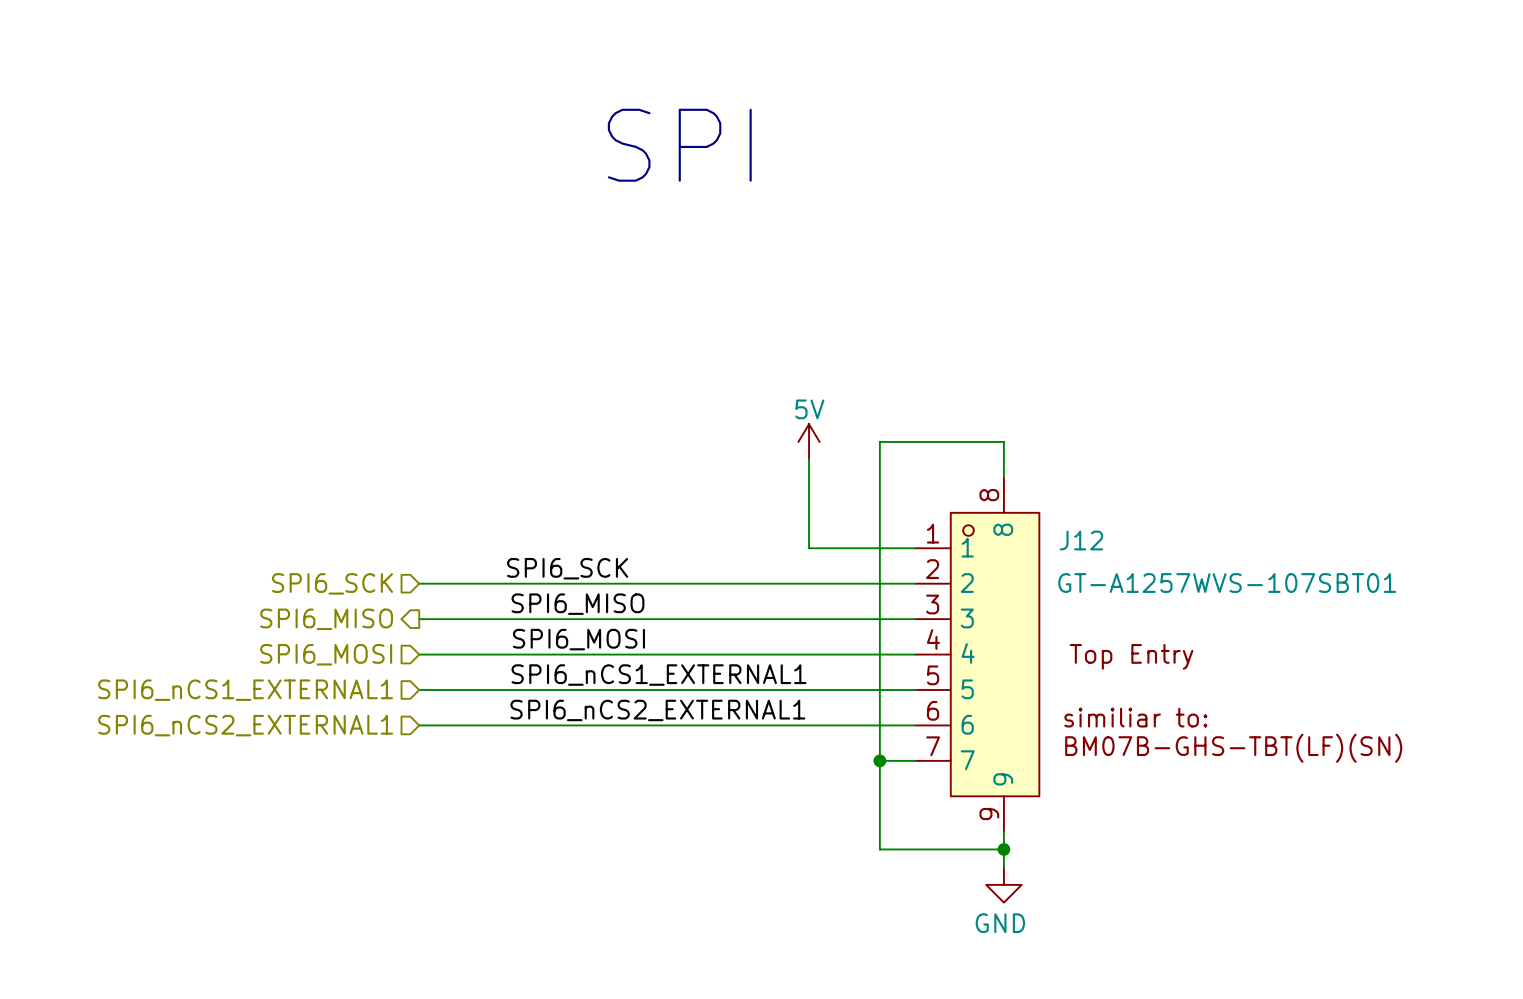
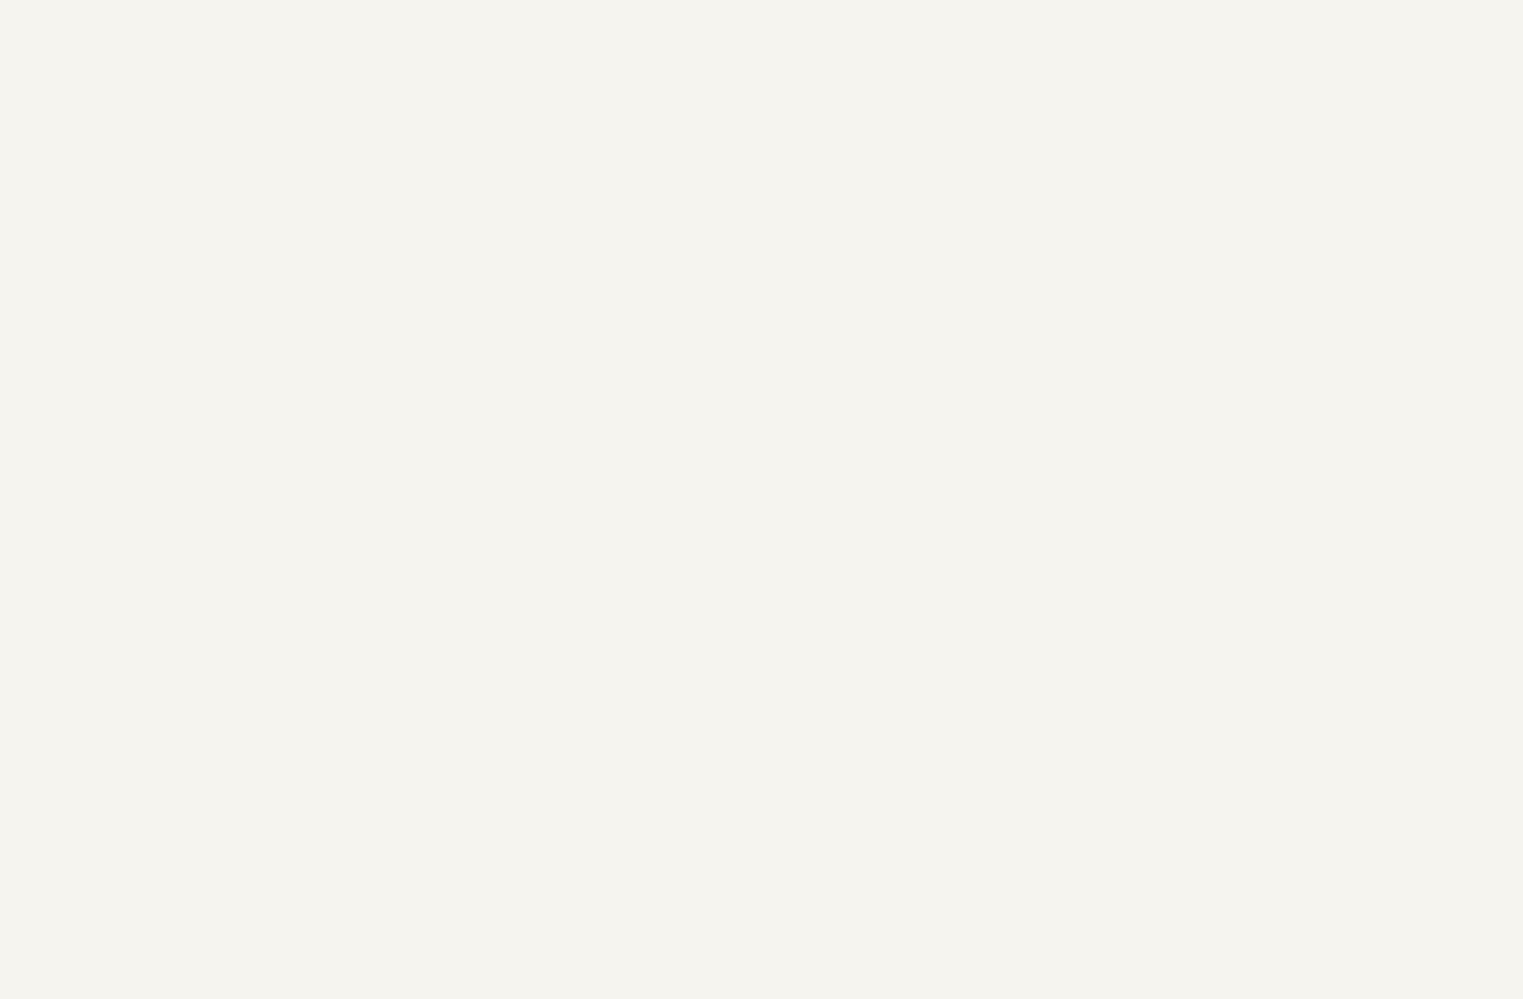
text: SPI (679, 145) -> none
power symbol: 5V (809, 441) -> none
wire: (809, 459) (809, 548) (915, 548) -> none
wire: (1003, 477) (1003, 441) (879, 441) (879, 849) (1003, 849) -> none
label: SPI6_SCK (567, 568) -> none
hierarchical label: SPI6_SCK (332, 583) -> none
wire: (419, 583) (915, 583) -> none
label: SPI6_MISO (577, 604) -> none
hierarchical label: SPI6_MISO (326, 619) -> none
wire: (419, 619) (915, 619) -> none
label: SPI6_MOSI (578, 639) -> none
hierarchical label: SPI6_MOSI (326, 654) -> none
wire: (419, 654) (915, 654) -> none
J12: GT-A1257WVS-107SBT01 (977, 654) -> none
label: SPI6_nCS1_EXTERNAL1 (658, 675) -> none
hierarchical label: SPI6_nCS1_EXTERNAL1 (245, 690) -> none
wire: (419, 690) (915, 690) -> none
label: SPI6_nCS2_EXTERNAL1 (657, 710) -> none
hierarchical label: SPI6_nCS2_EXTERNAL1 (245, 725) -> none
wire: (419, 725) (915, 725) -> none
wire: (879, 760) (915, 760) -> none
junction: (879, 760) -> none
wire: (1003, 831) (1003, 867) -> none
junction: (1003, 849) -> none
power symbol: GND (1003, 884) -> none

